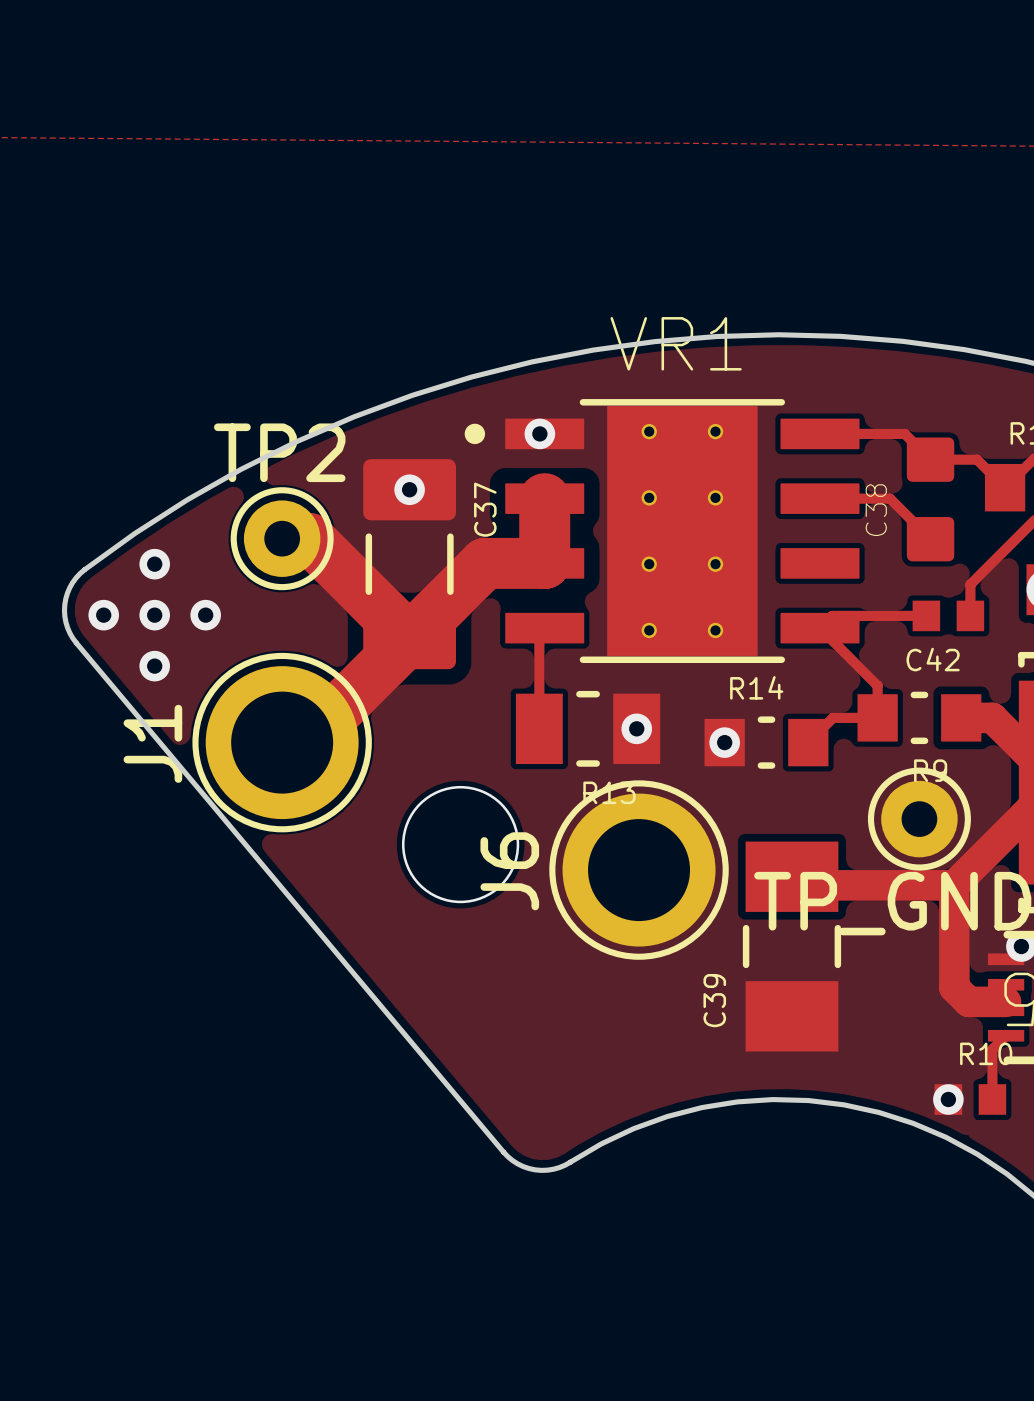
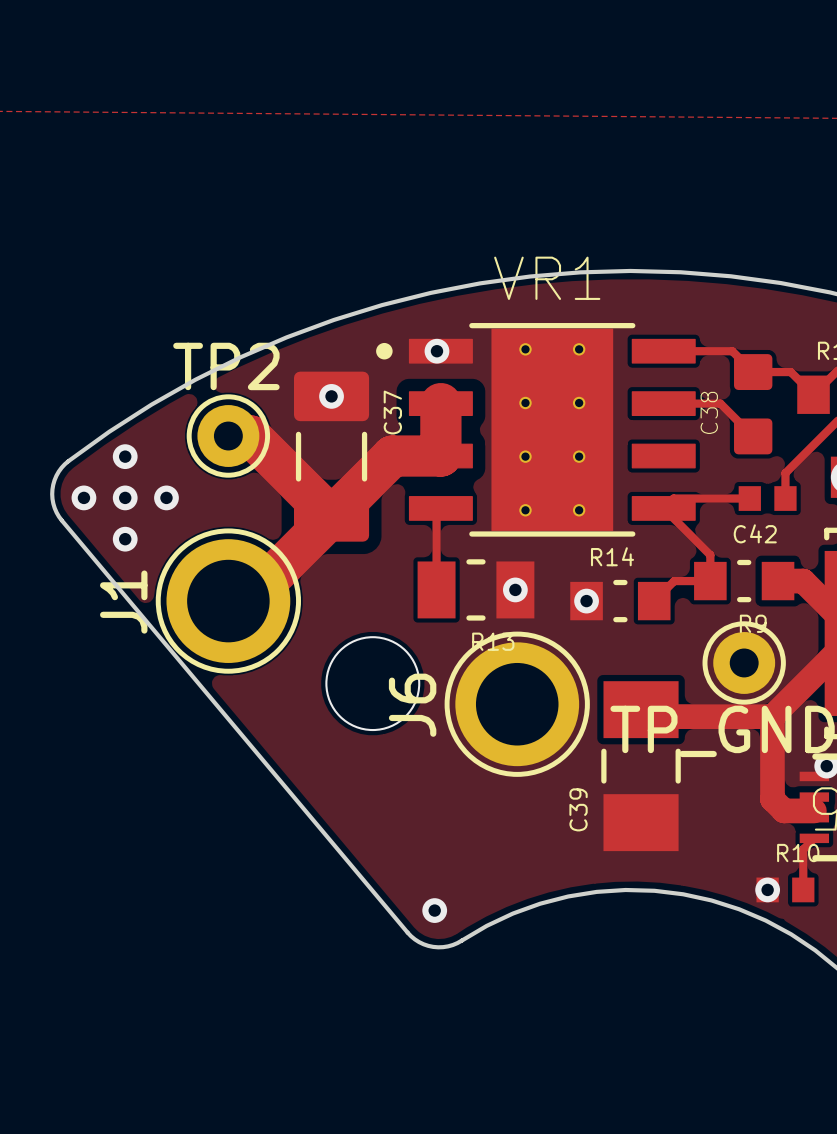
via: none -> (434, 910)

